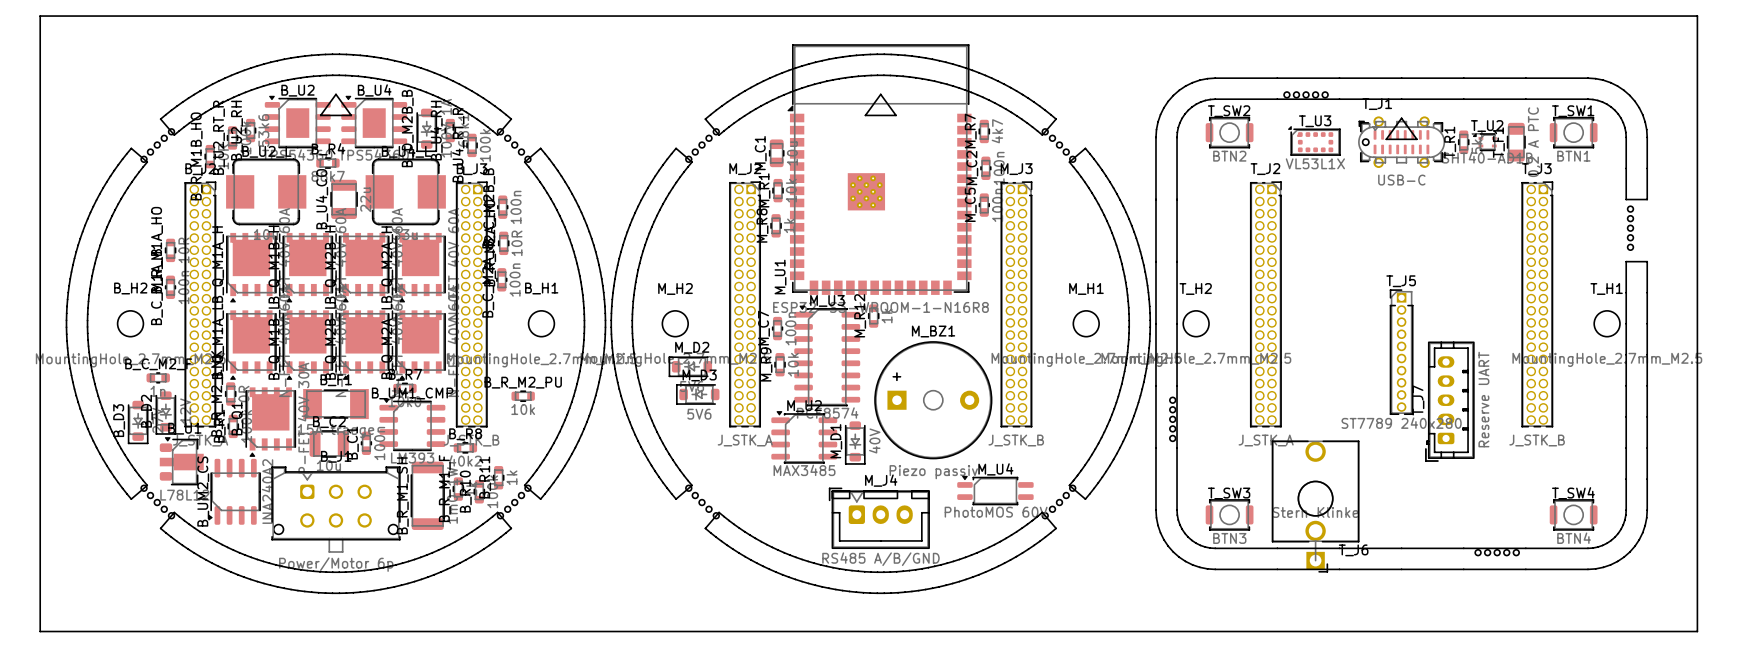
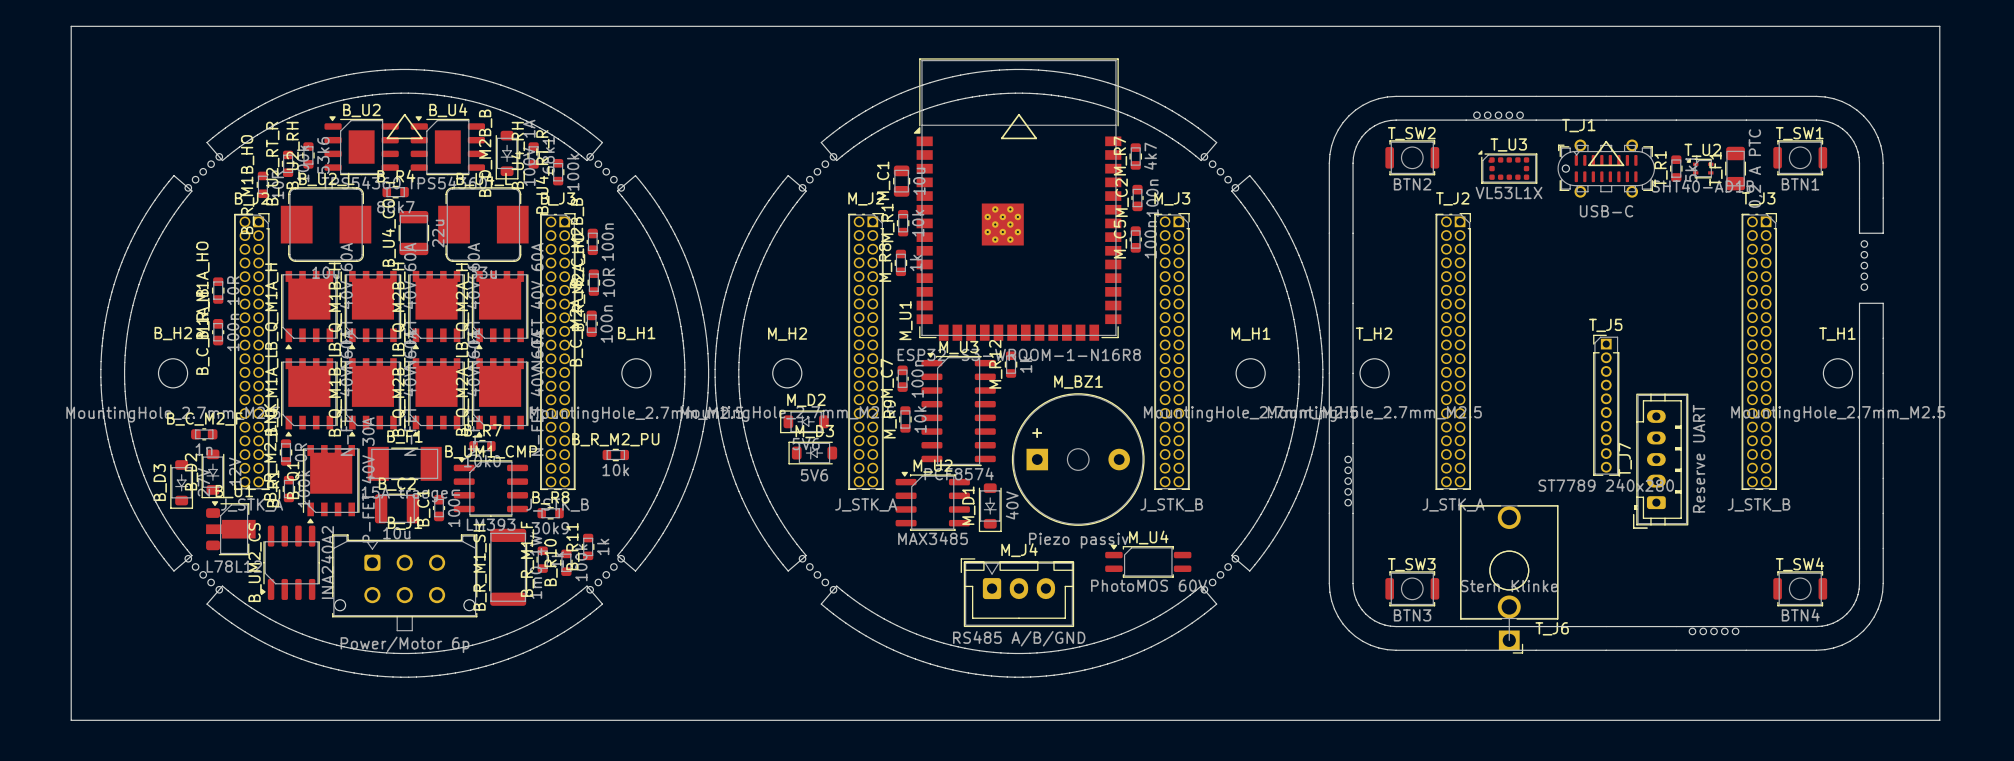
B_R8 value: 40k2 (465, 460) -> 30k9 (550, 528)

